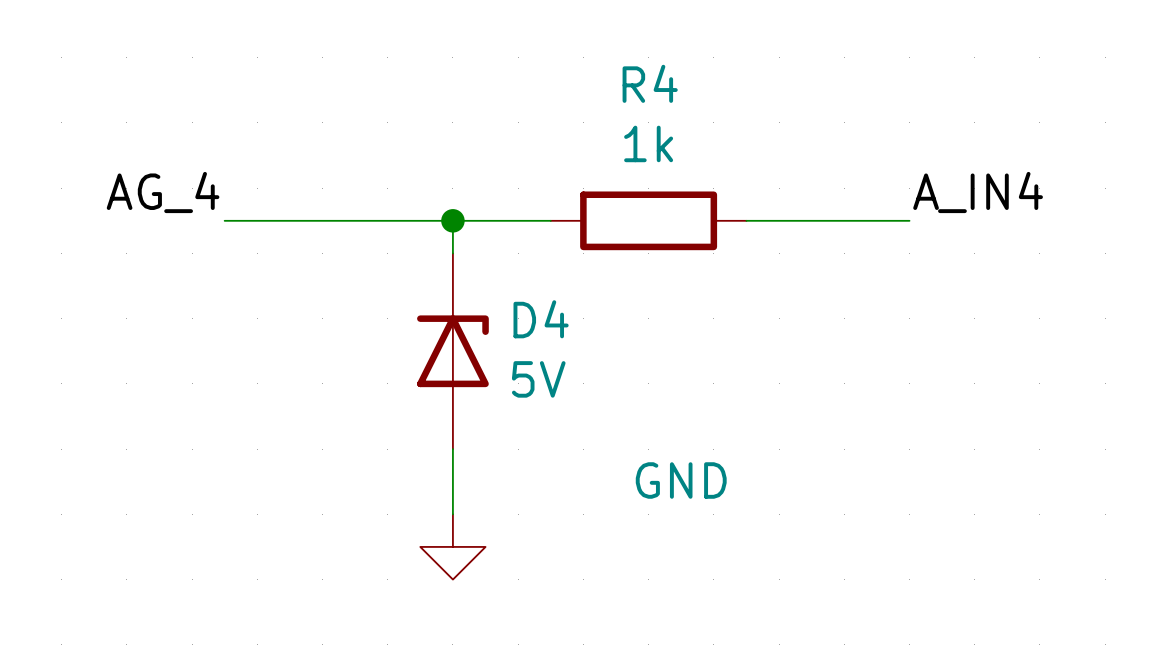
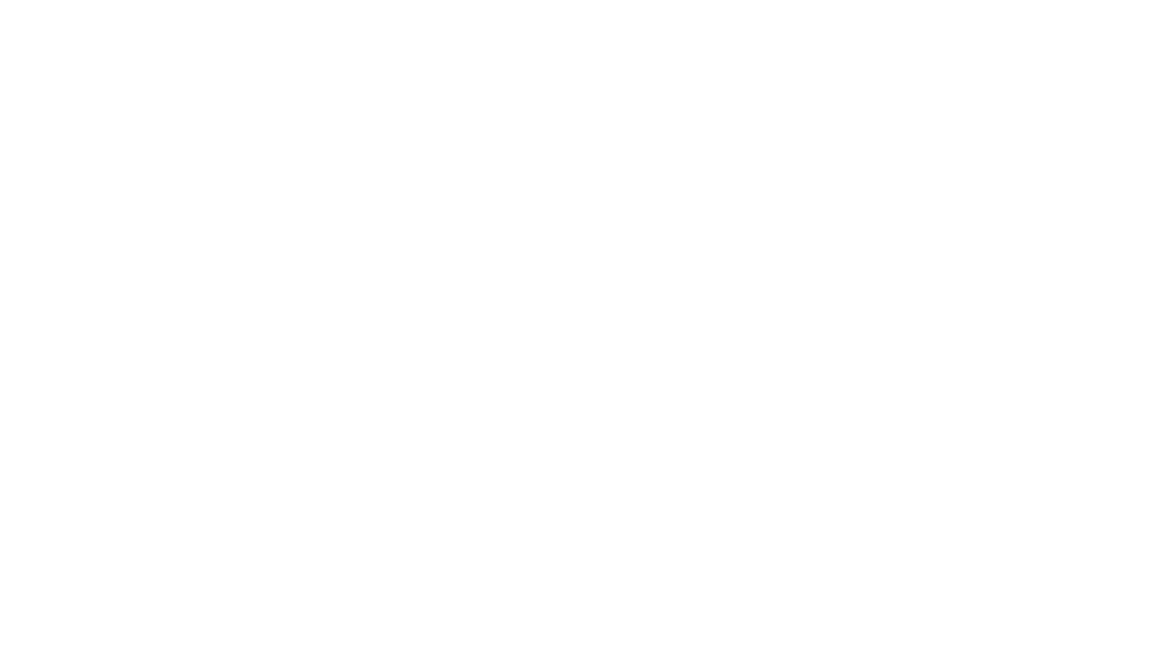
label: AG_4 (163, 192) -> none
label: A_IN4 (978, 192) -> none
wire: (224, 220) (550, 220) -> none
wire: (452, 220) (452, 253) -> none
junction: (452, 220) -> none
R4: 1k (648, 220) -> none
wire: (746, 220) (909, 220) -> none
D4: 5V (452, 351) -> none
wire: (452, 449) (452, 514) -> none
power symbol: GND (452, 546) -> none

